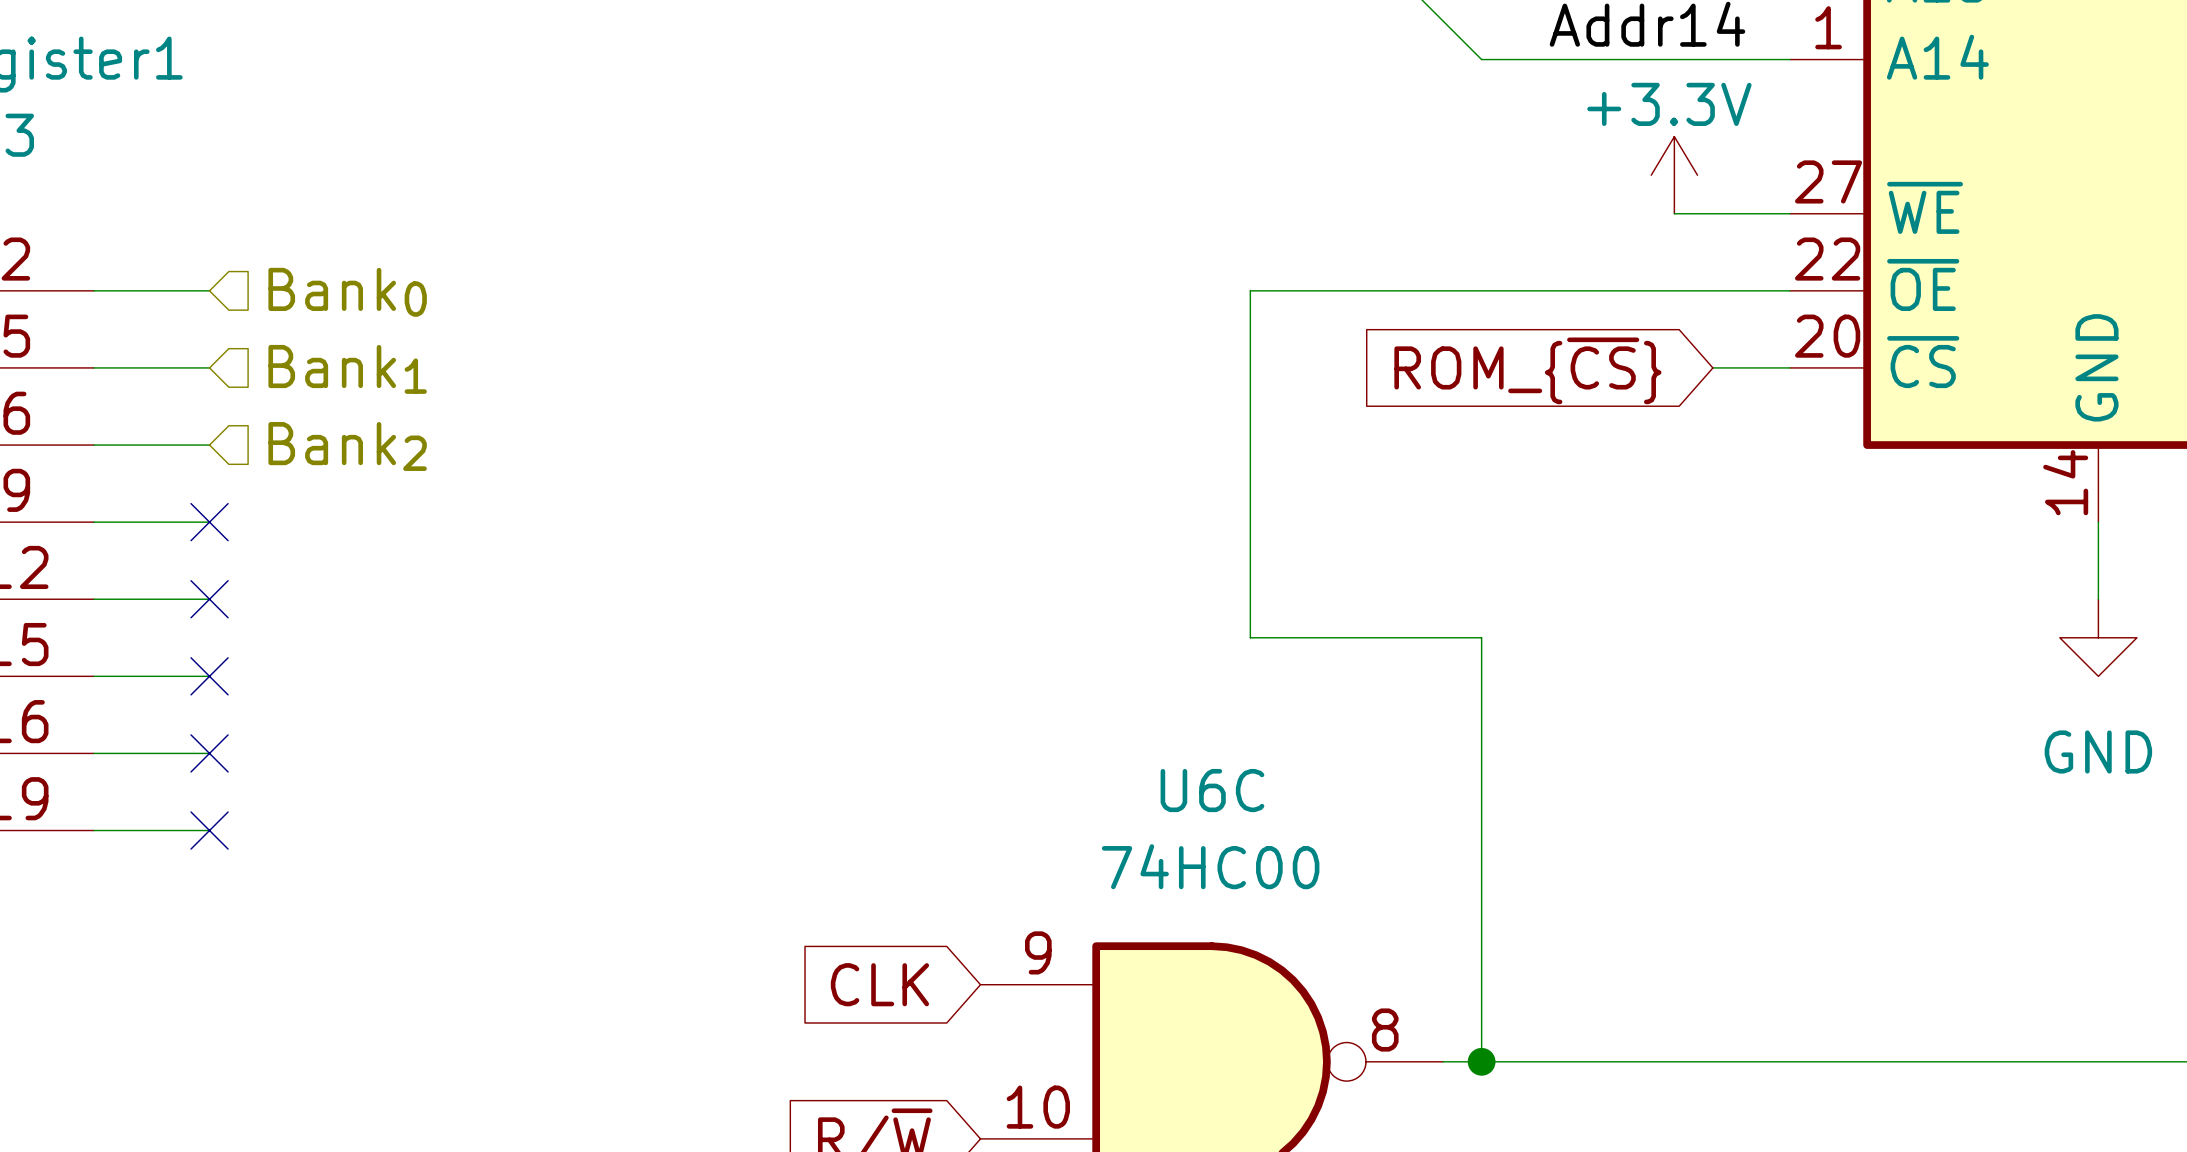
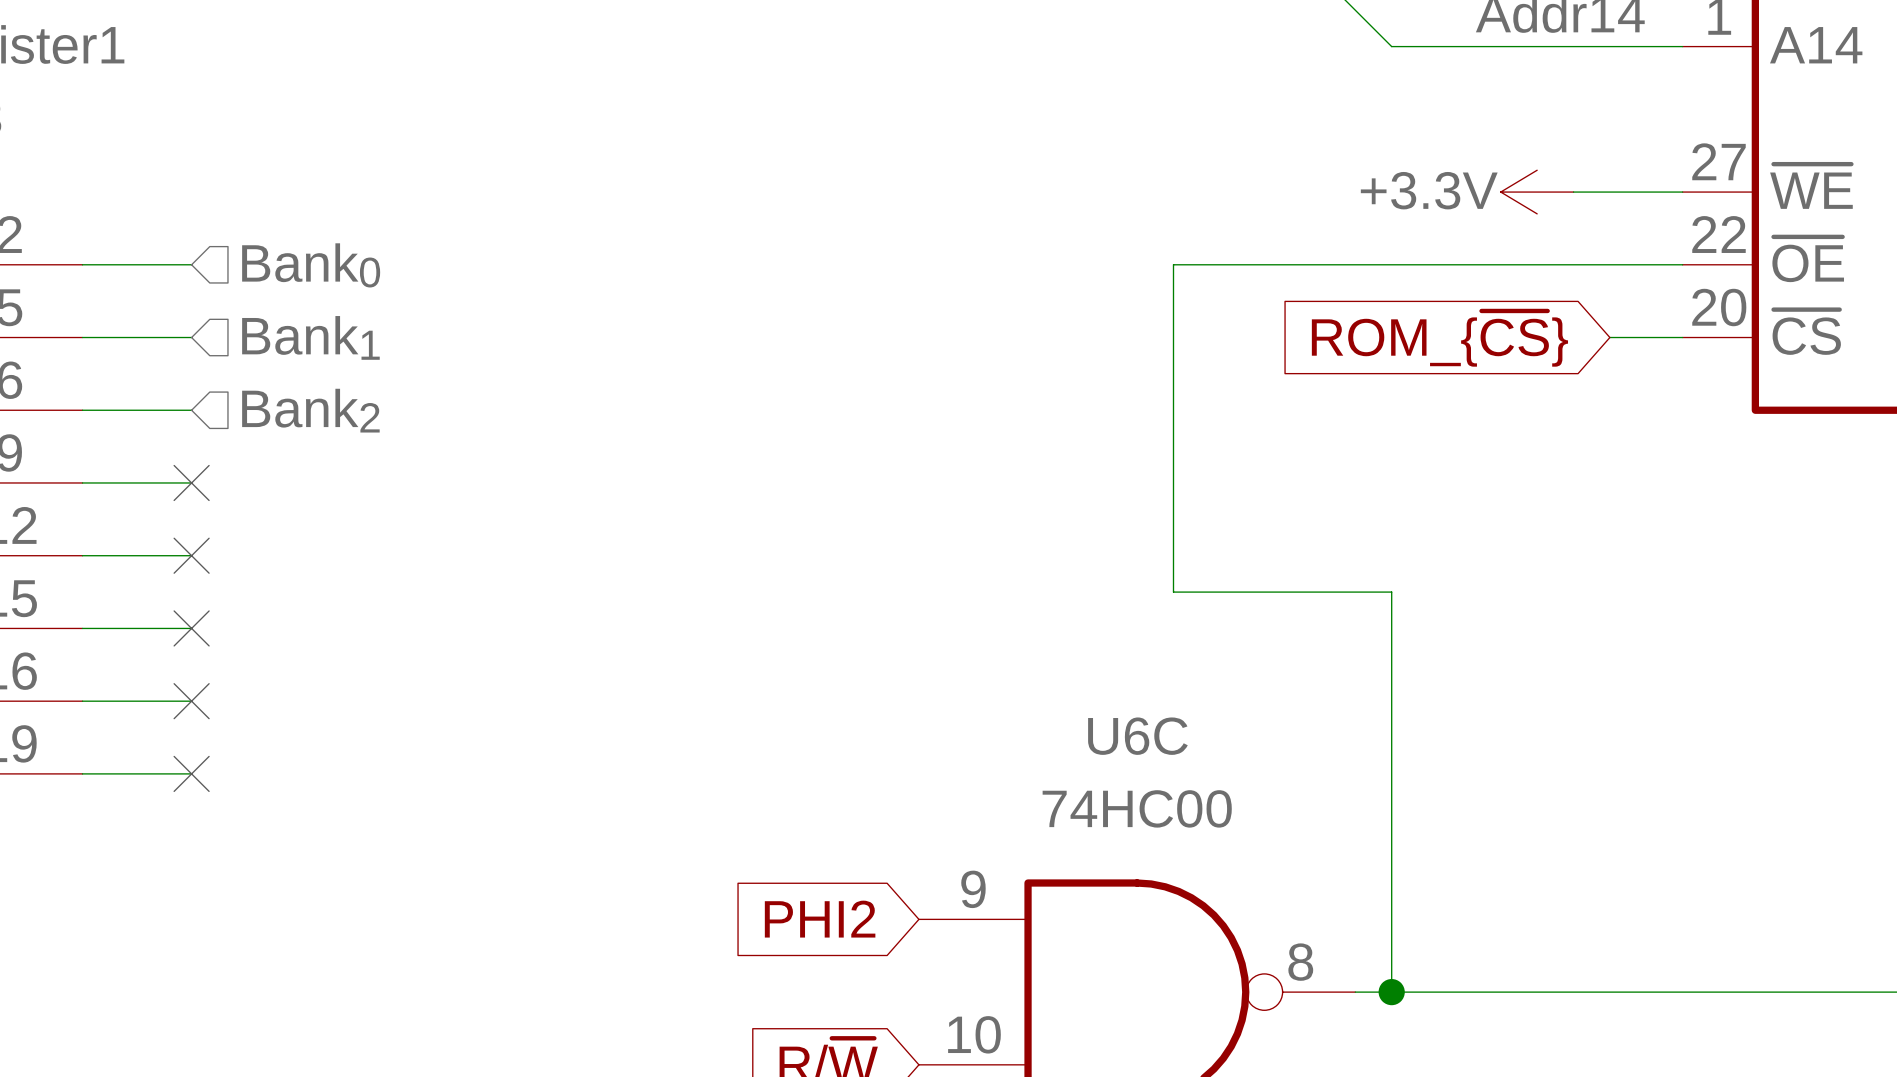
power symbol rotation: 0° (1674, 175) -> 90° counterclockwise (1537, 192)
power symbol position: +3.3V (1674, 175) -> +3.3V (1537, 192)
global label: CLK (879, 984) -> PHI2 (820, 919)

